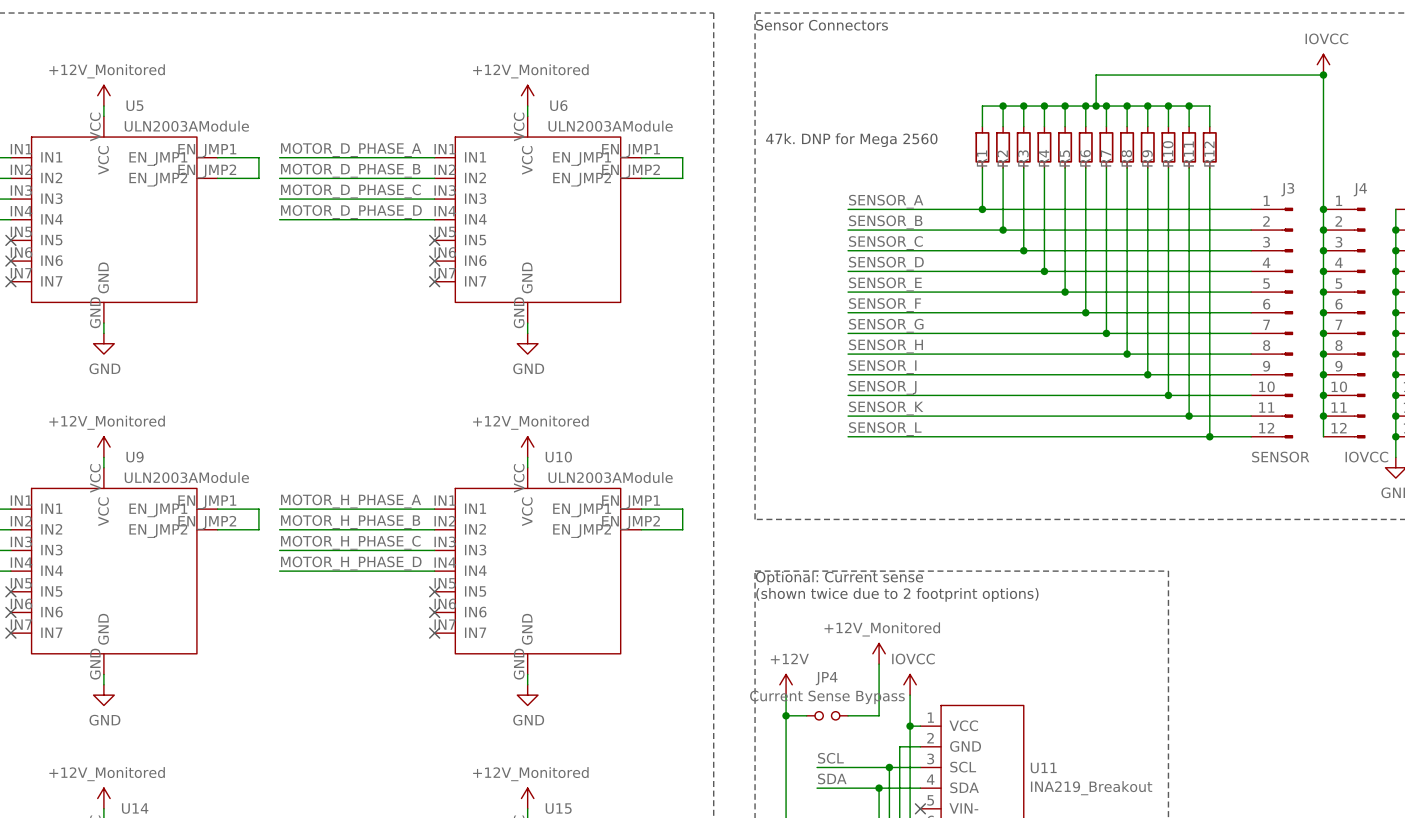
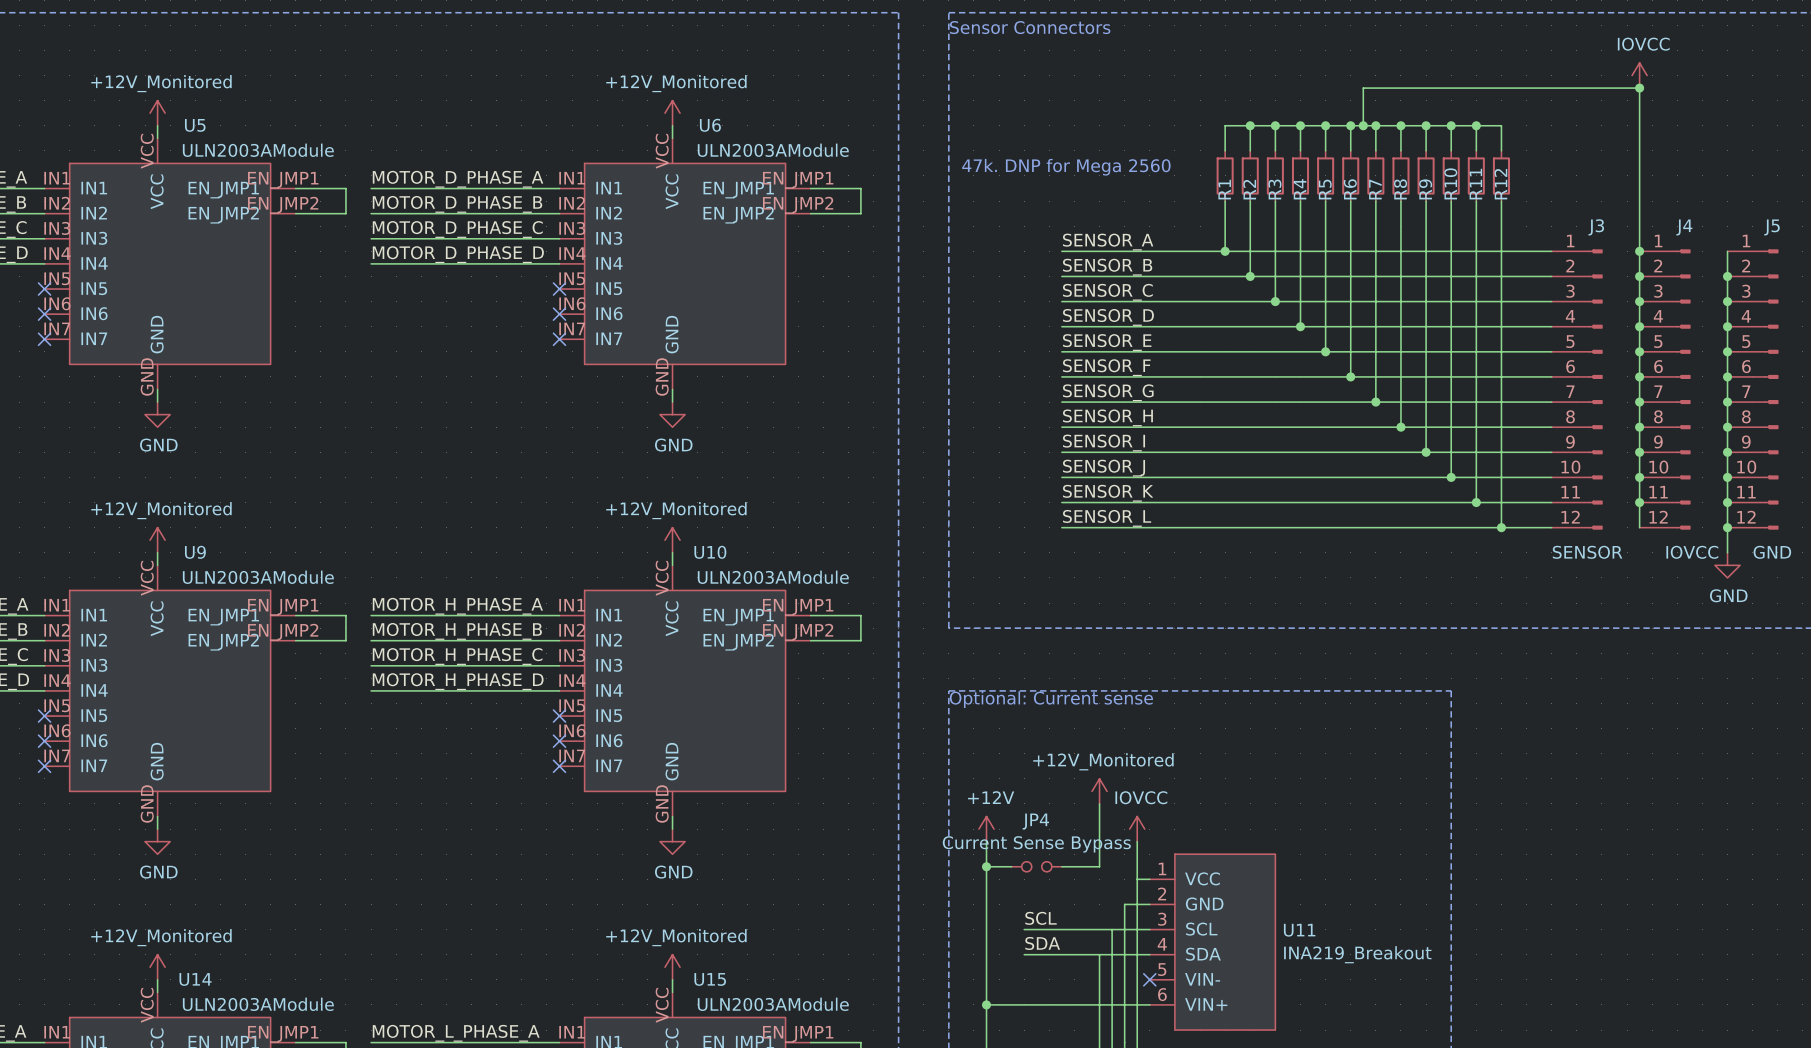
text: (shown twice due to 2 footprint options) (897, 594) -> none
junction: (910, 726) -> none
junction: (889, 767) -> none
junction: (879, 788) -> none

